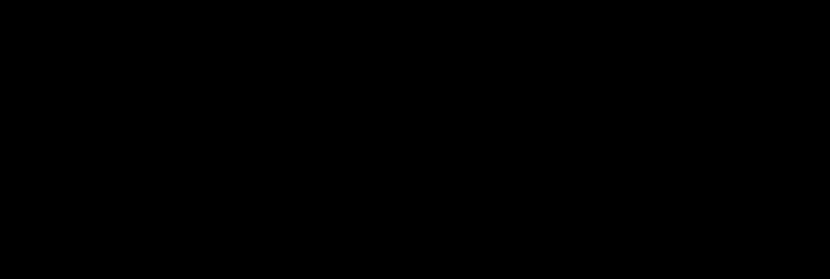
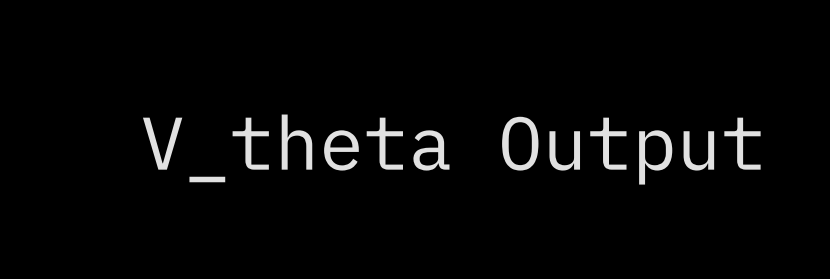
text: none -> V_theta Output (451, 149)

